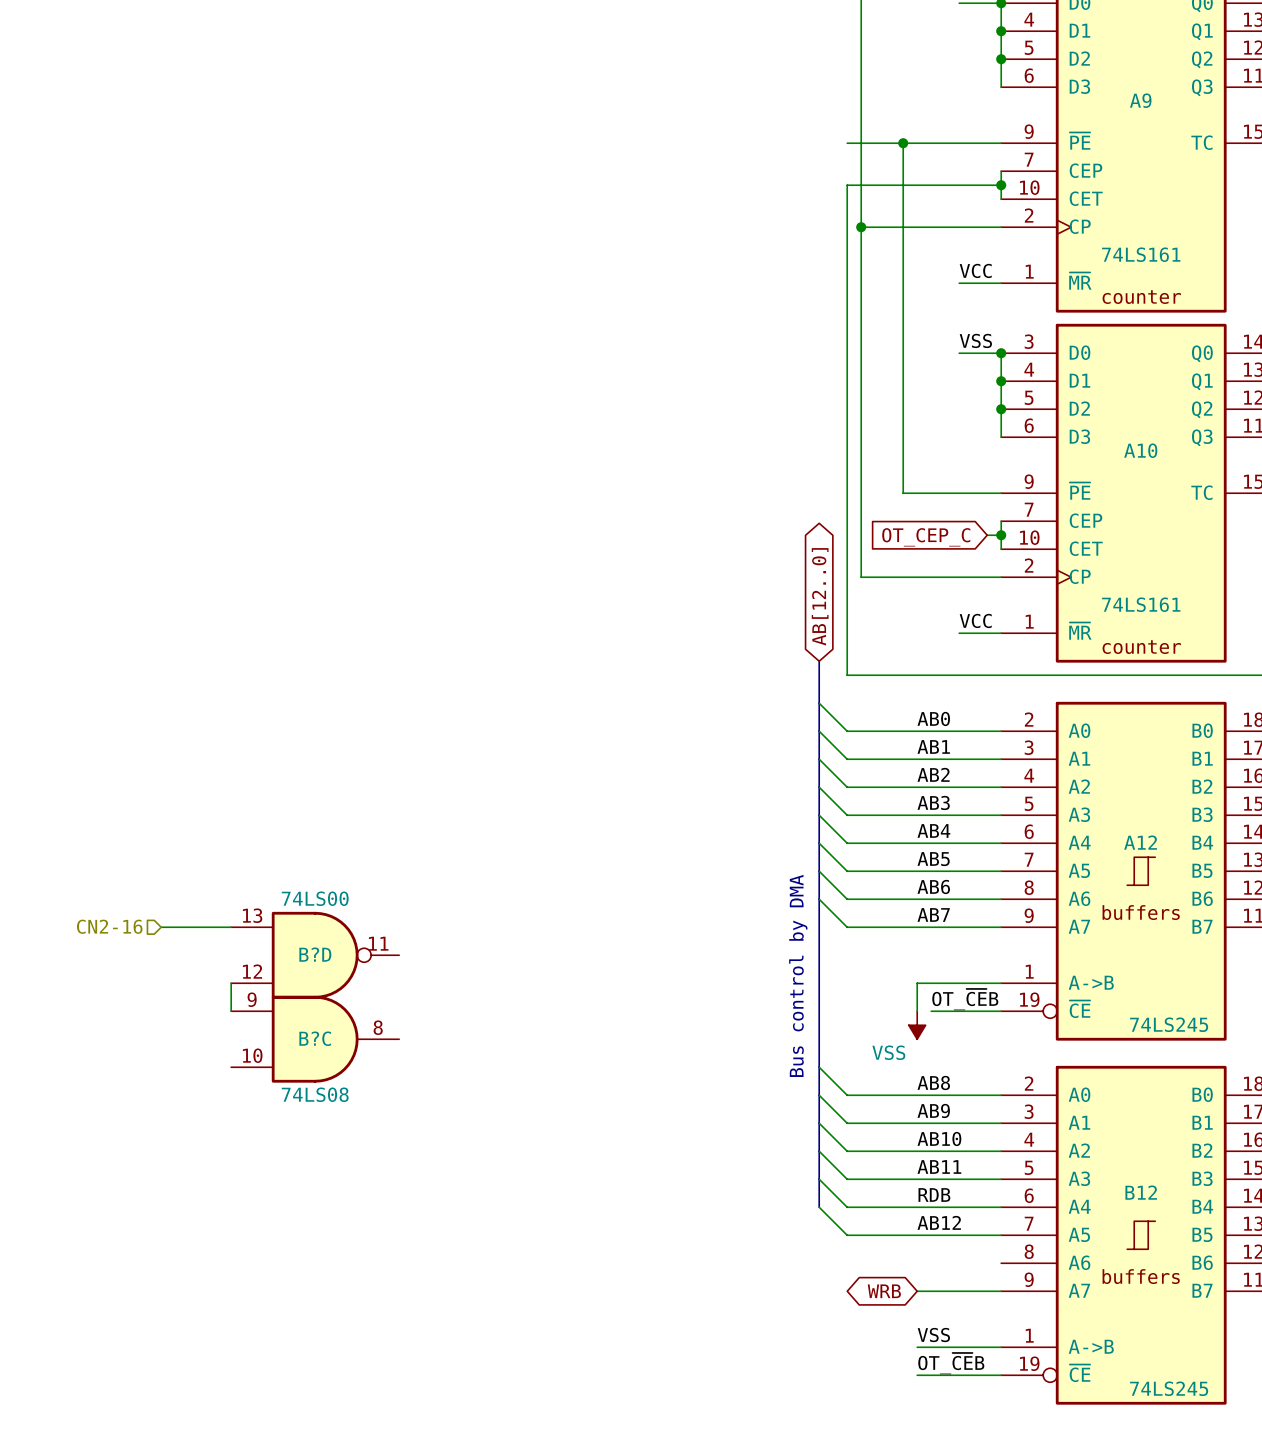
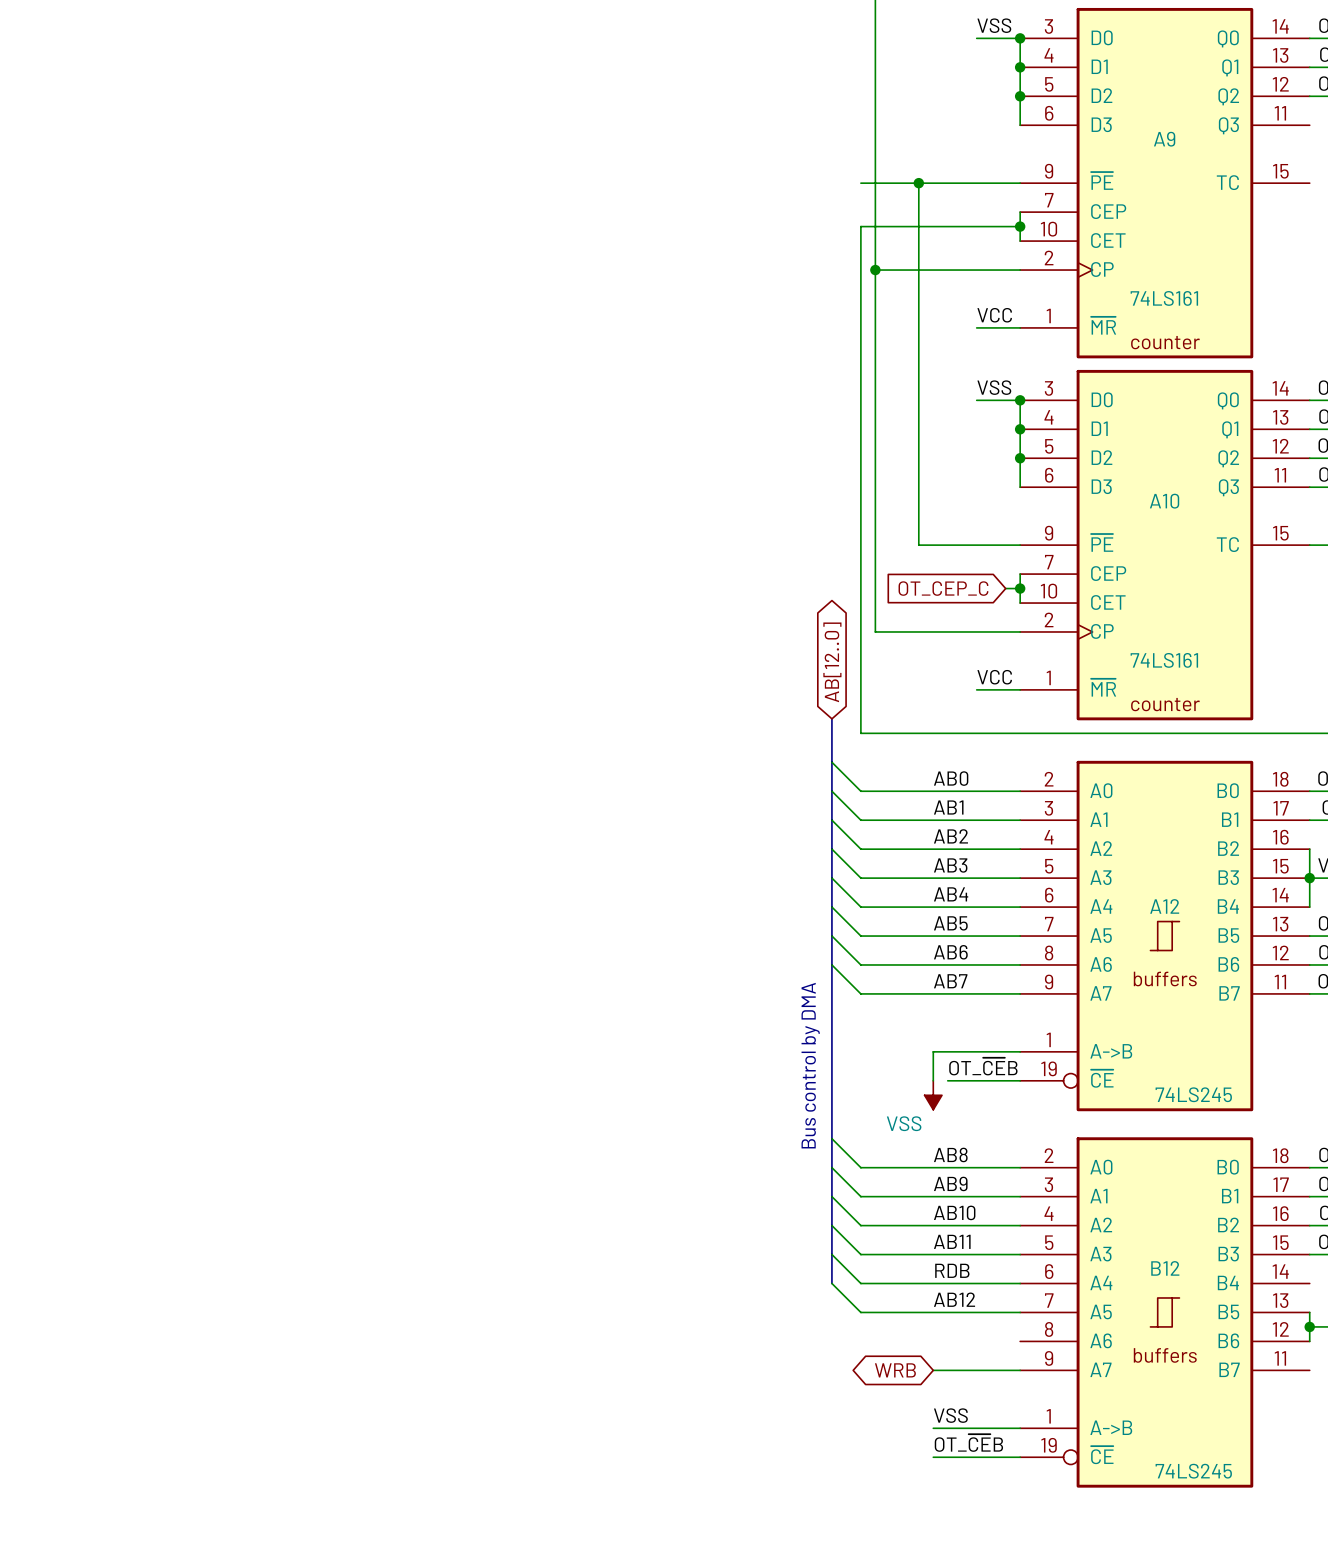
hierarchical label: CN2-16 (109, 926) -> none
wire: (161, 927) (231, 927) -> none
B?D: 74LS00 (315, 955) -> none
wire: (231, 983) (231, 1011) -> none
B?C: 74LS08 (315, 1039) -> none

